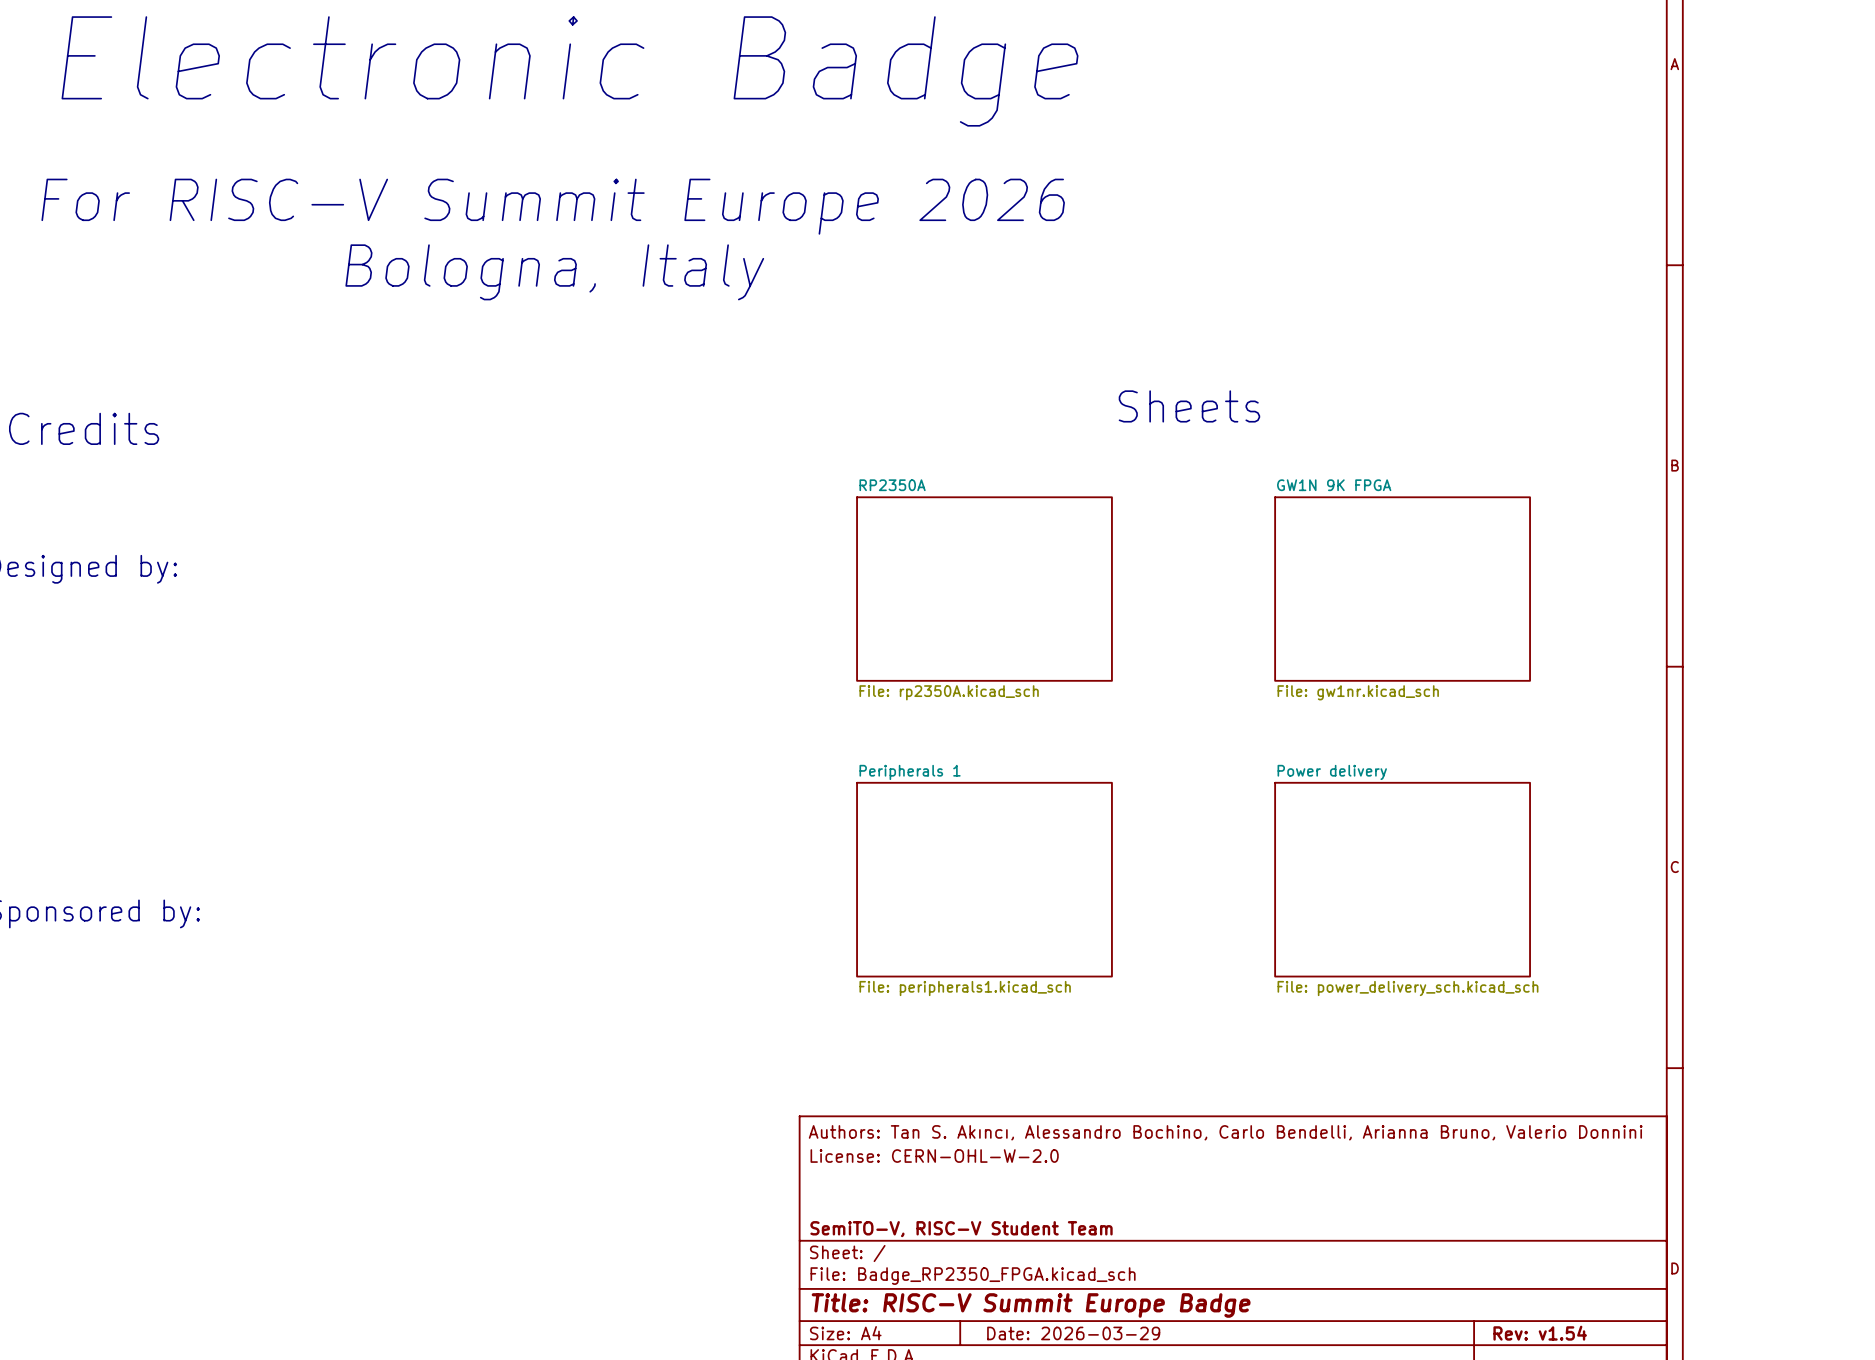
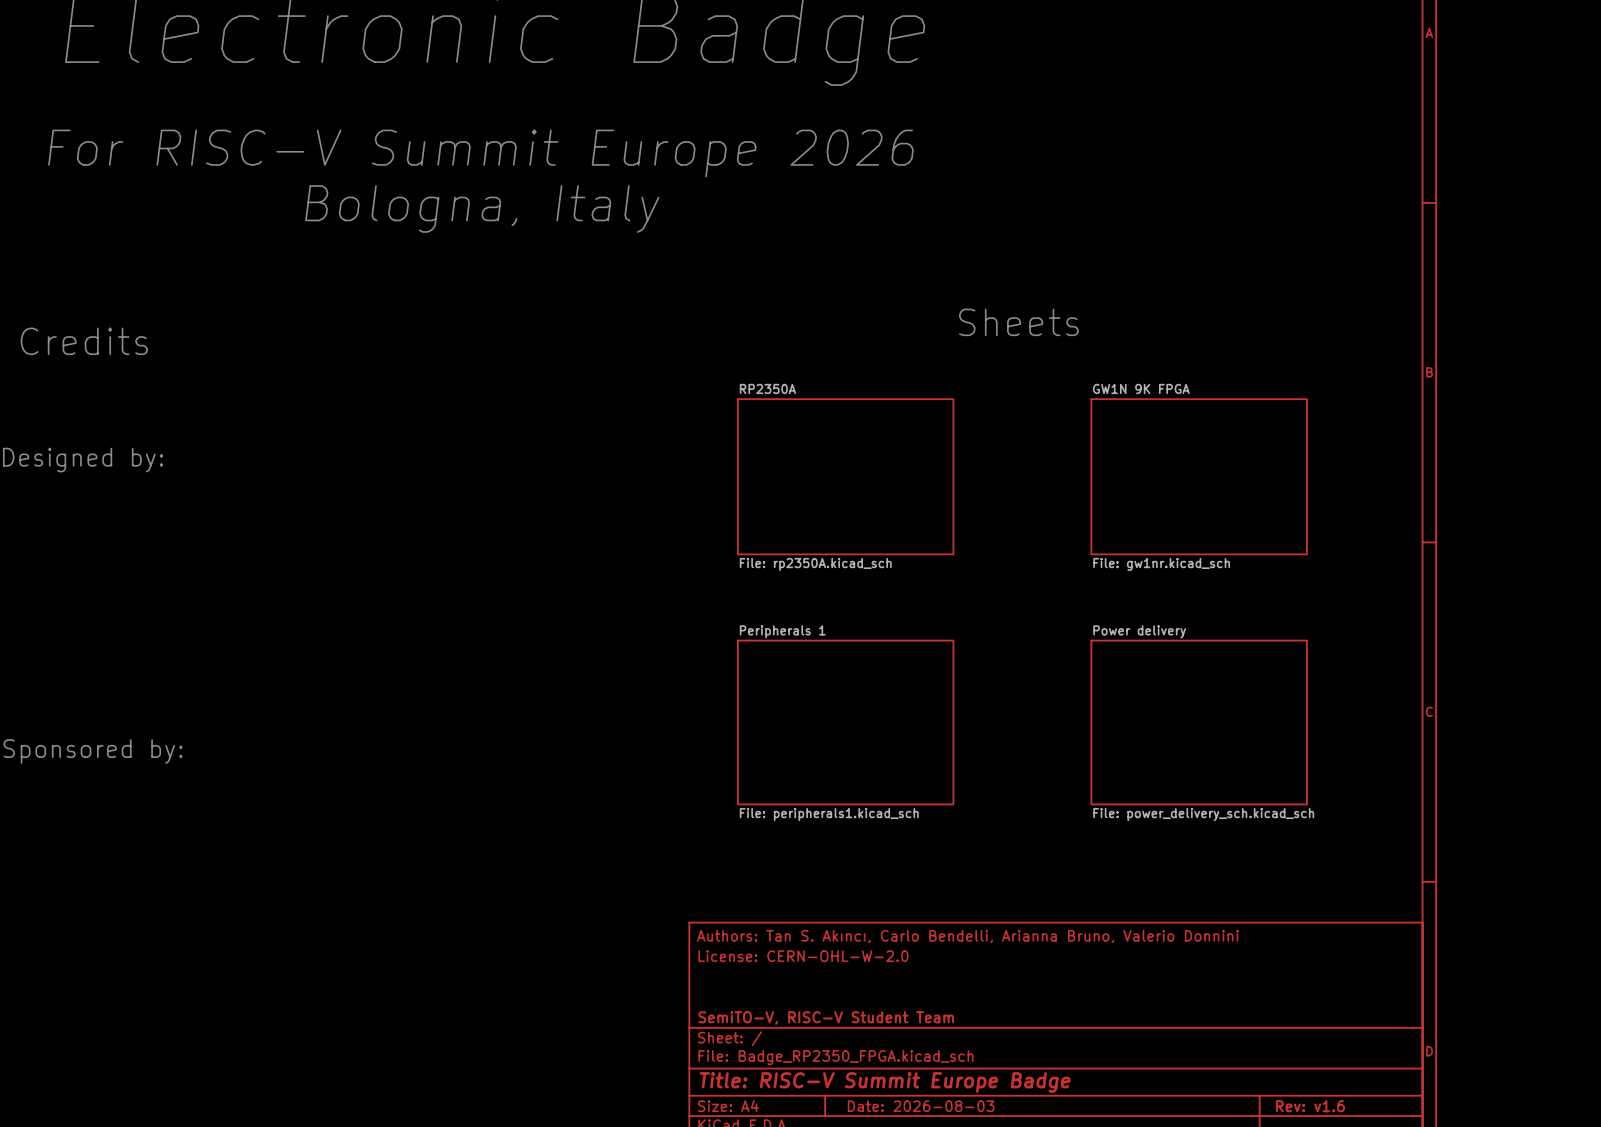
title block: Authors: Tan S. Akıncı, Alessandro Bochino, Carlo Bendelli, Arianna Bruno, Valerio Donnini (1225, 1132) -> Authors: Tan S. Akıncı, Carlo Bendelli, Arianna Bruno, Valerio Donnini (967, 936)
title block: Date: 2026-03-29 (1073, 1333) -> Date: 2026-08-03 (921, 1106)
title block: Rev: v1.54 (1540, 1333) -> Rev: v1.6 (1310, 1106)

